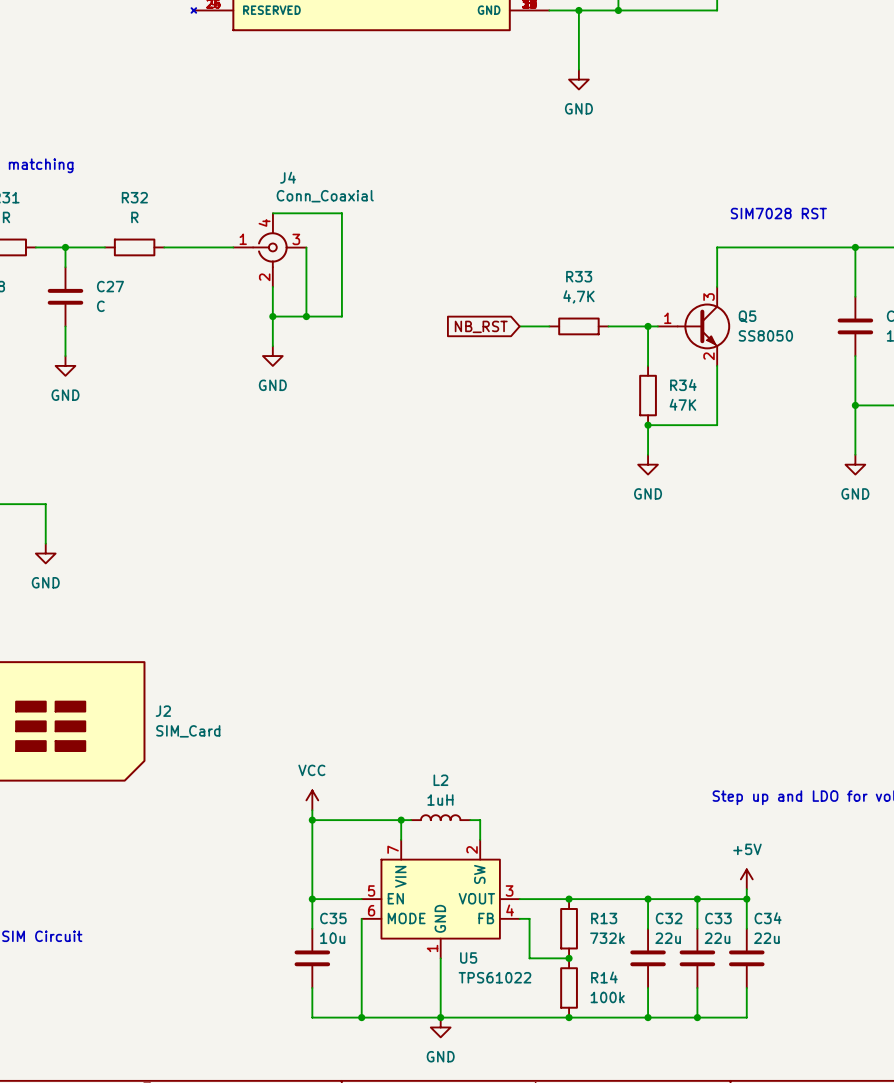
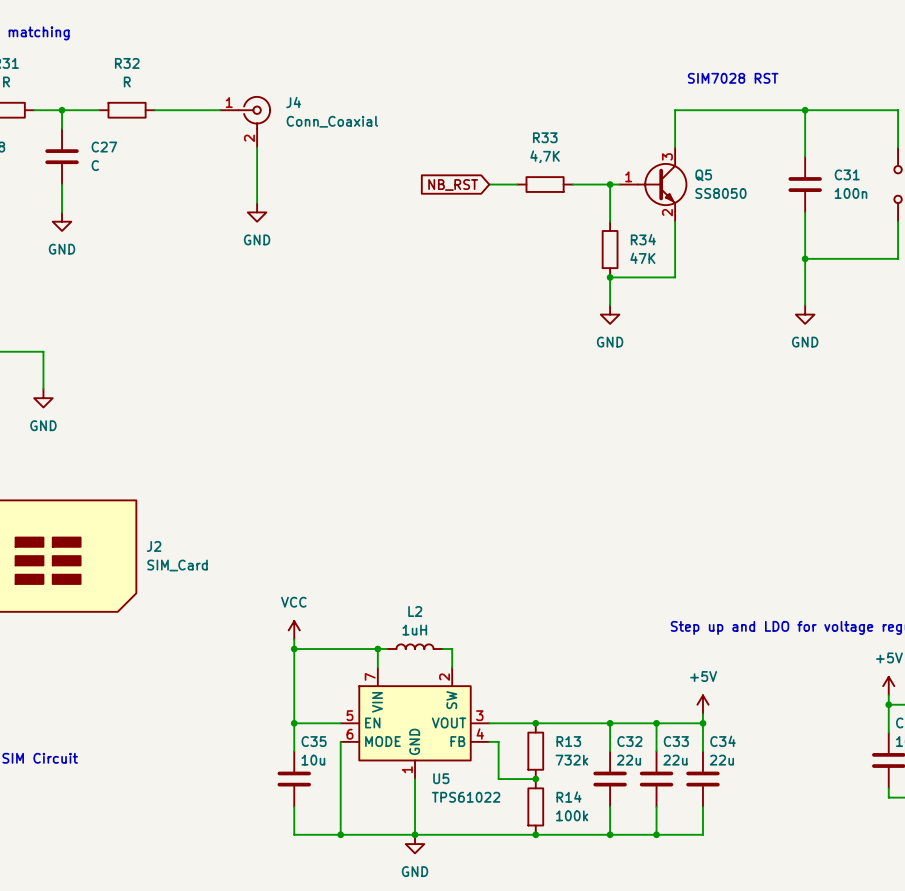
J4 name position: J4 (288, 177) -> J4 (293, 102)
J4 value position: Conn_Coaxial (325, 196) -> Conn_Coaxial (332, 121)
J4 symbol: [233, 213, 307, 287] -> [219, 95, 272, 148]
wire: (272, 213) (341, 213) (341, 316) (272, 316) -> none
wire: (306, 247) (306, 316) -> none
junction: (272, 316) -> none
junction: (306, 316) -> none

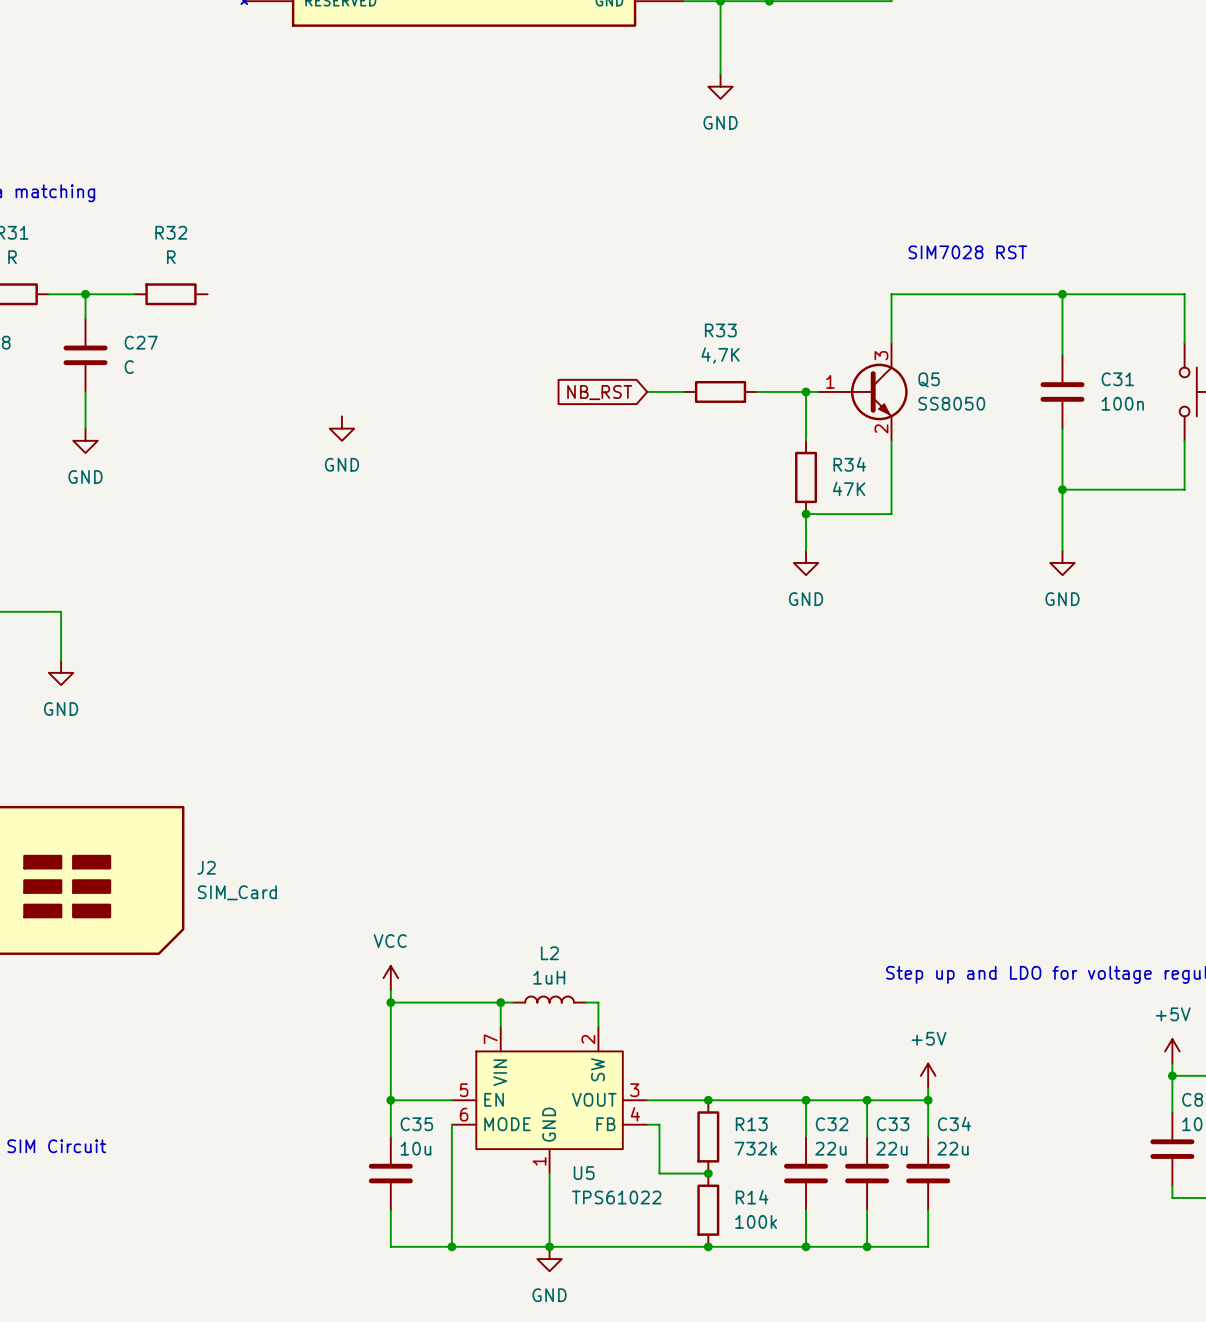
wire: (154, 110) (219, 110) -> none
J4: Conn_Coaxial (245, 121) -> none
wire: (257, 147) (257, 203) -> none

